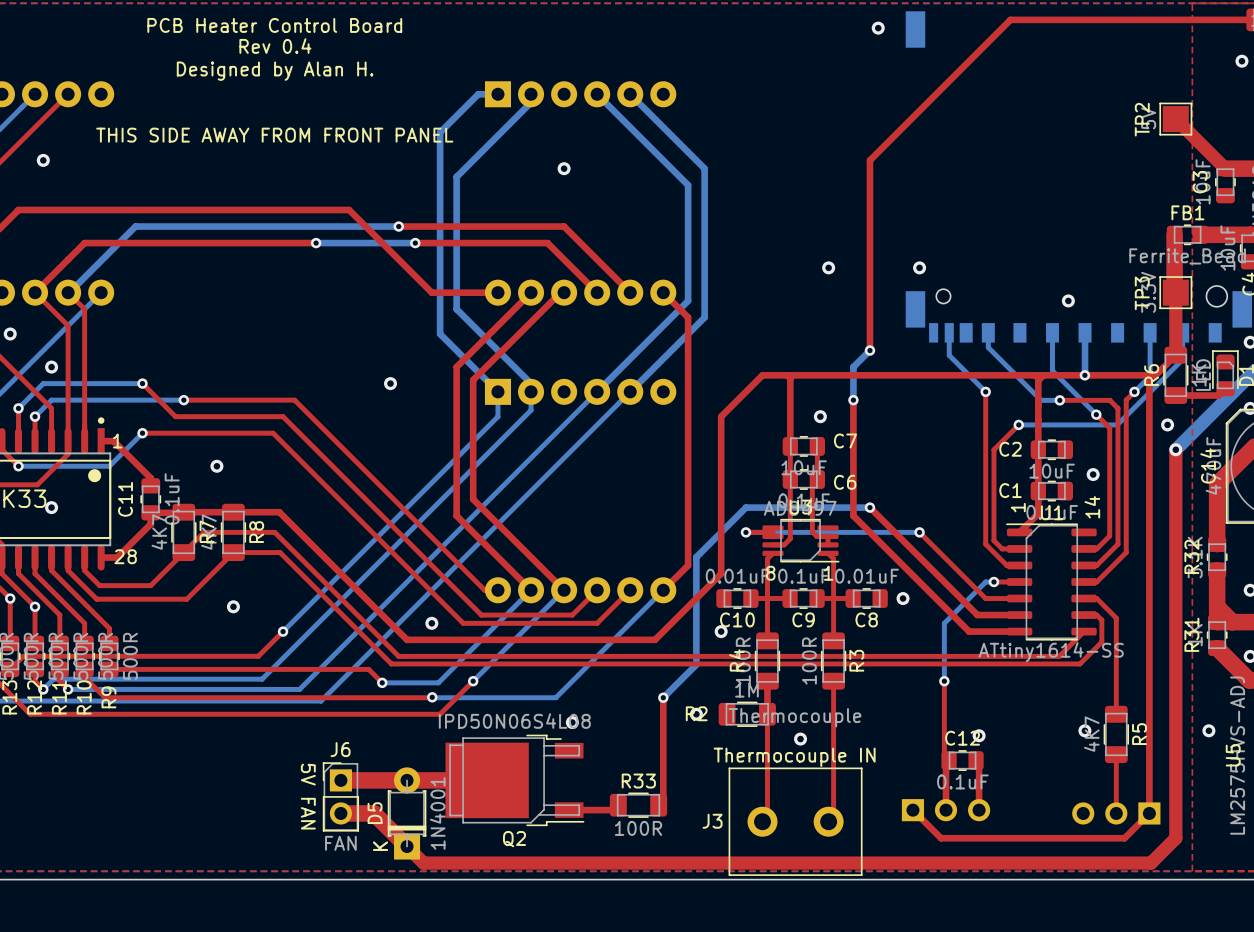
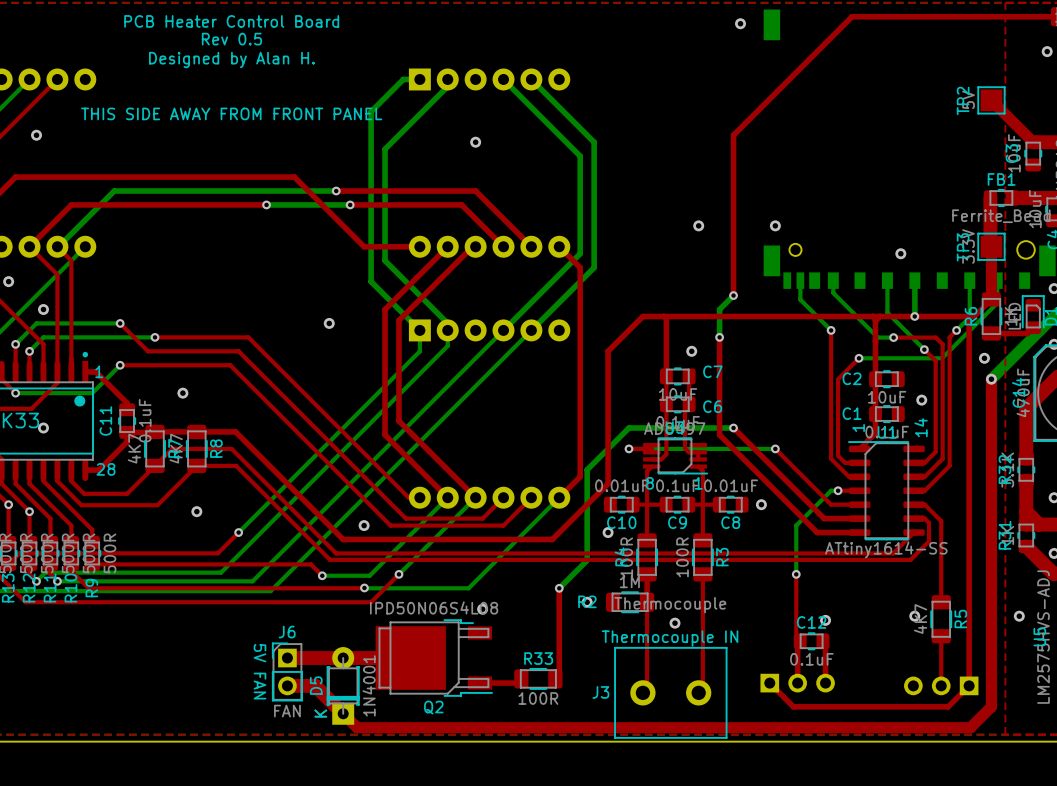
text: Rev 0.4 (275, 46) -> Rev 0.5 (231, 39)

